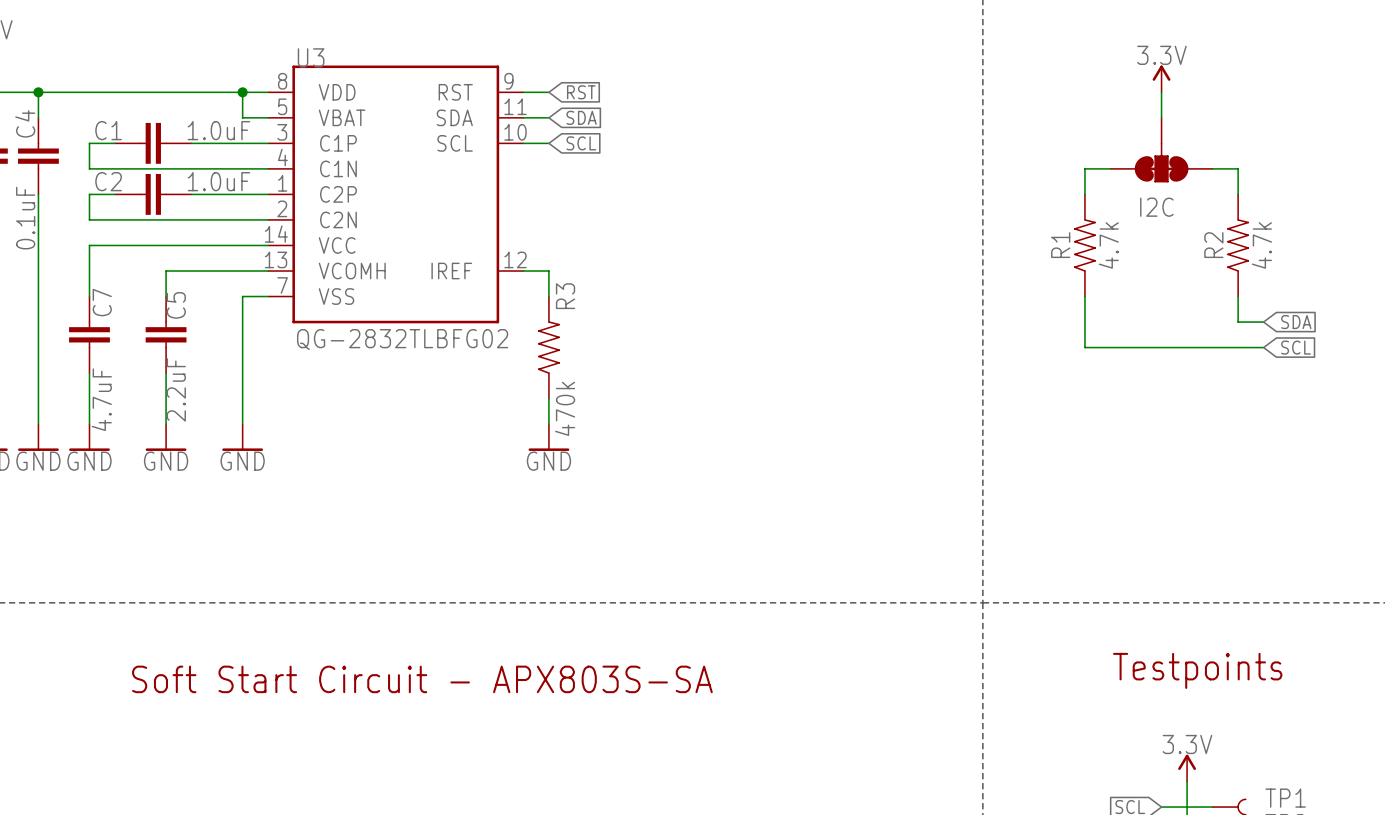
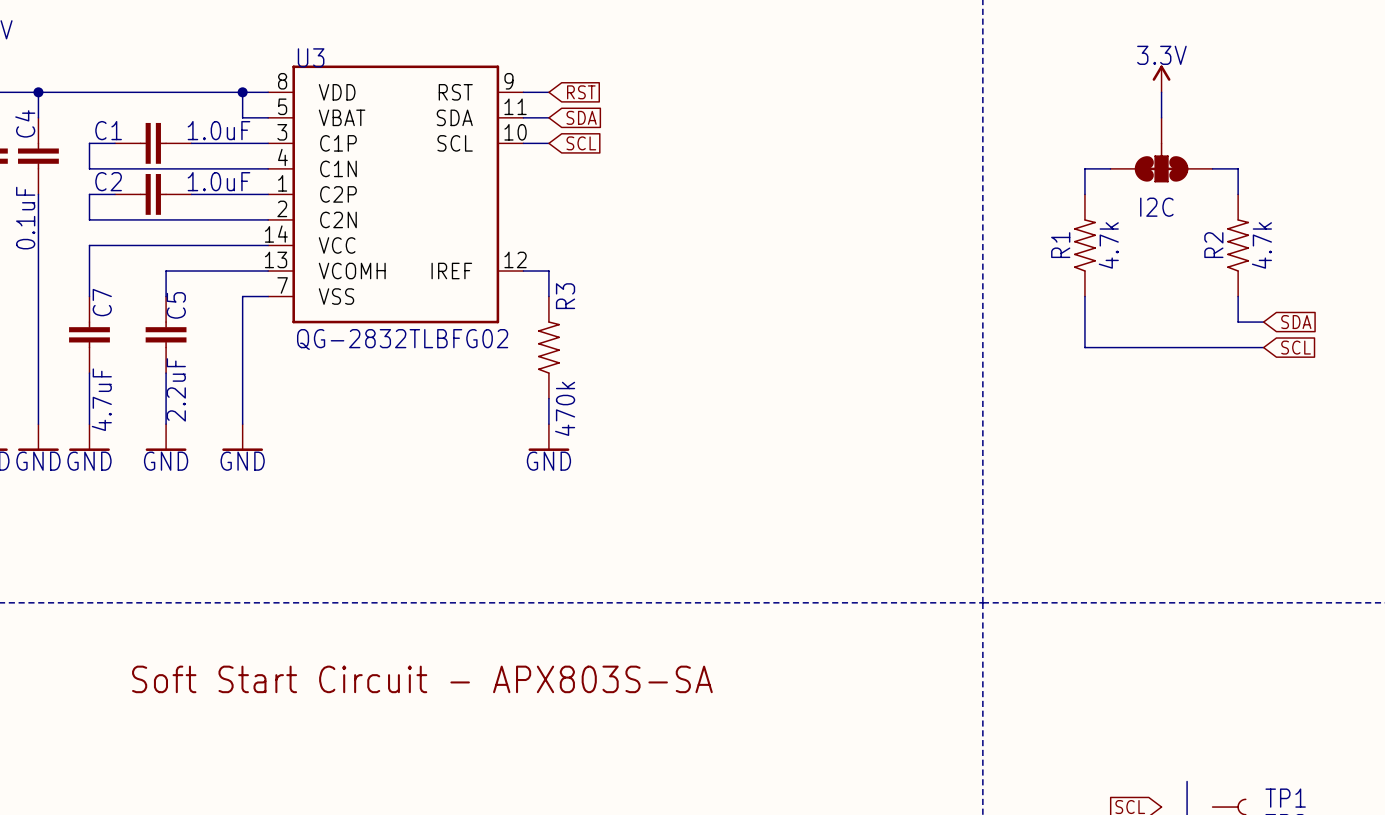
text: Testpoints (1197, 670) -> none
power symbol: 3.3V (1187, 768) -> none
wire: (1161, 807) (1212, 807) -> none

